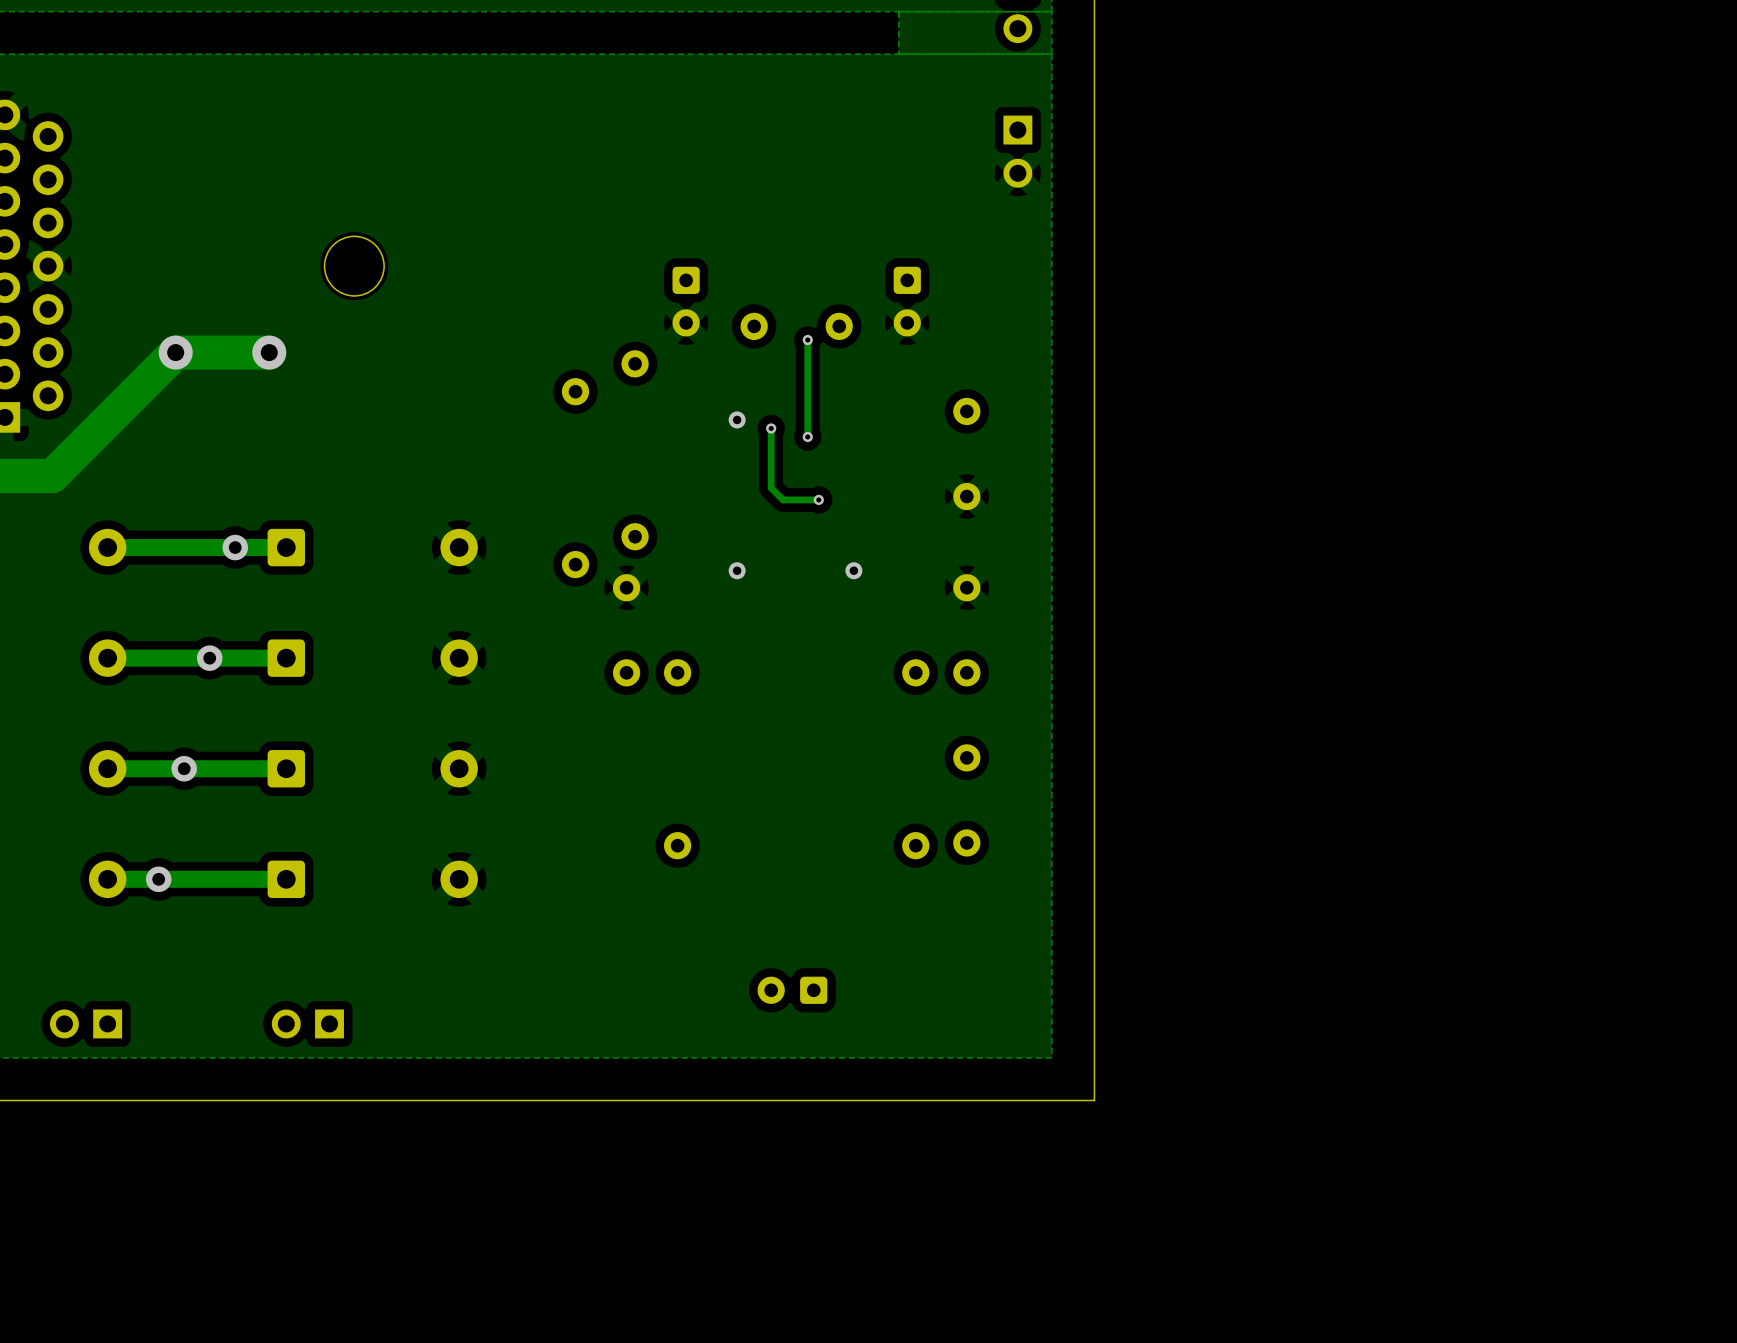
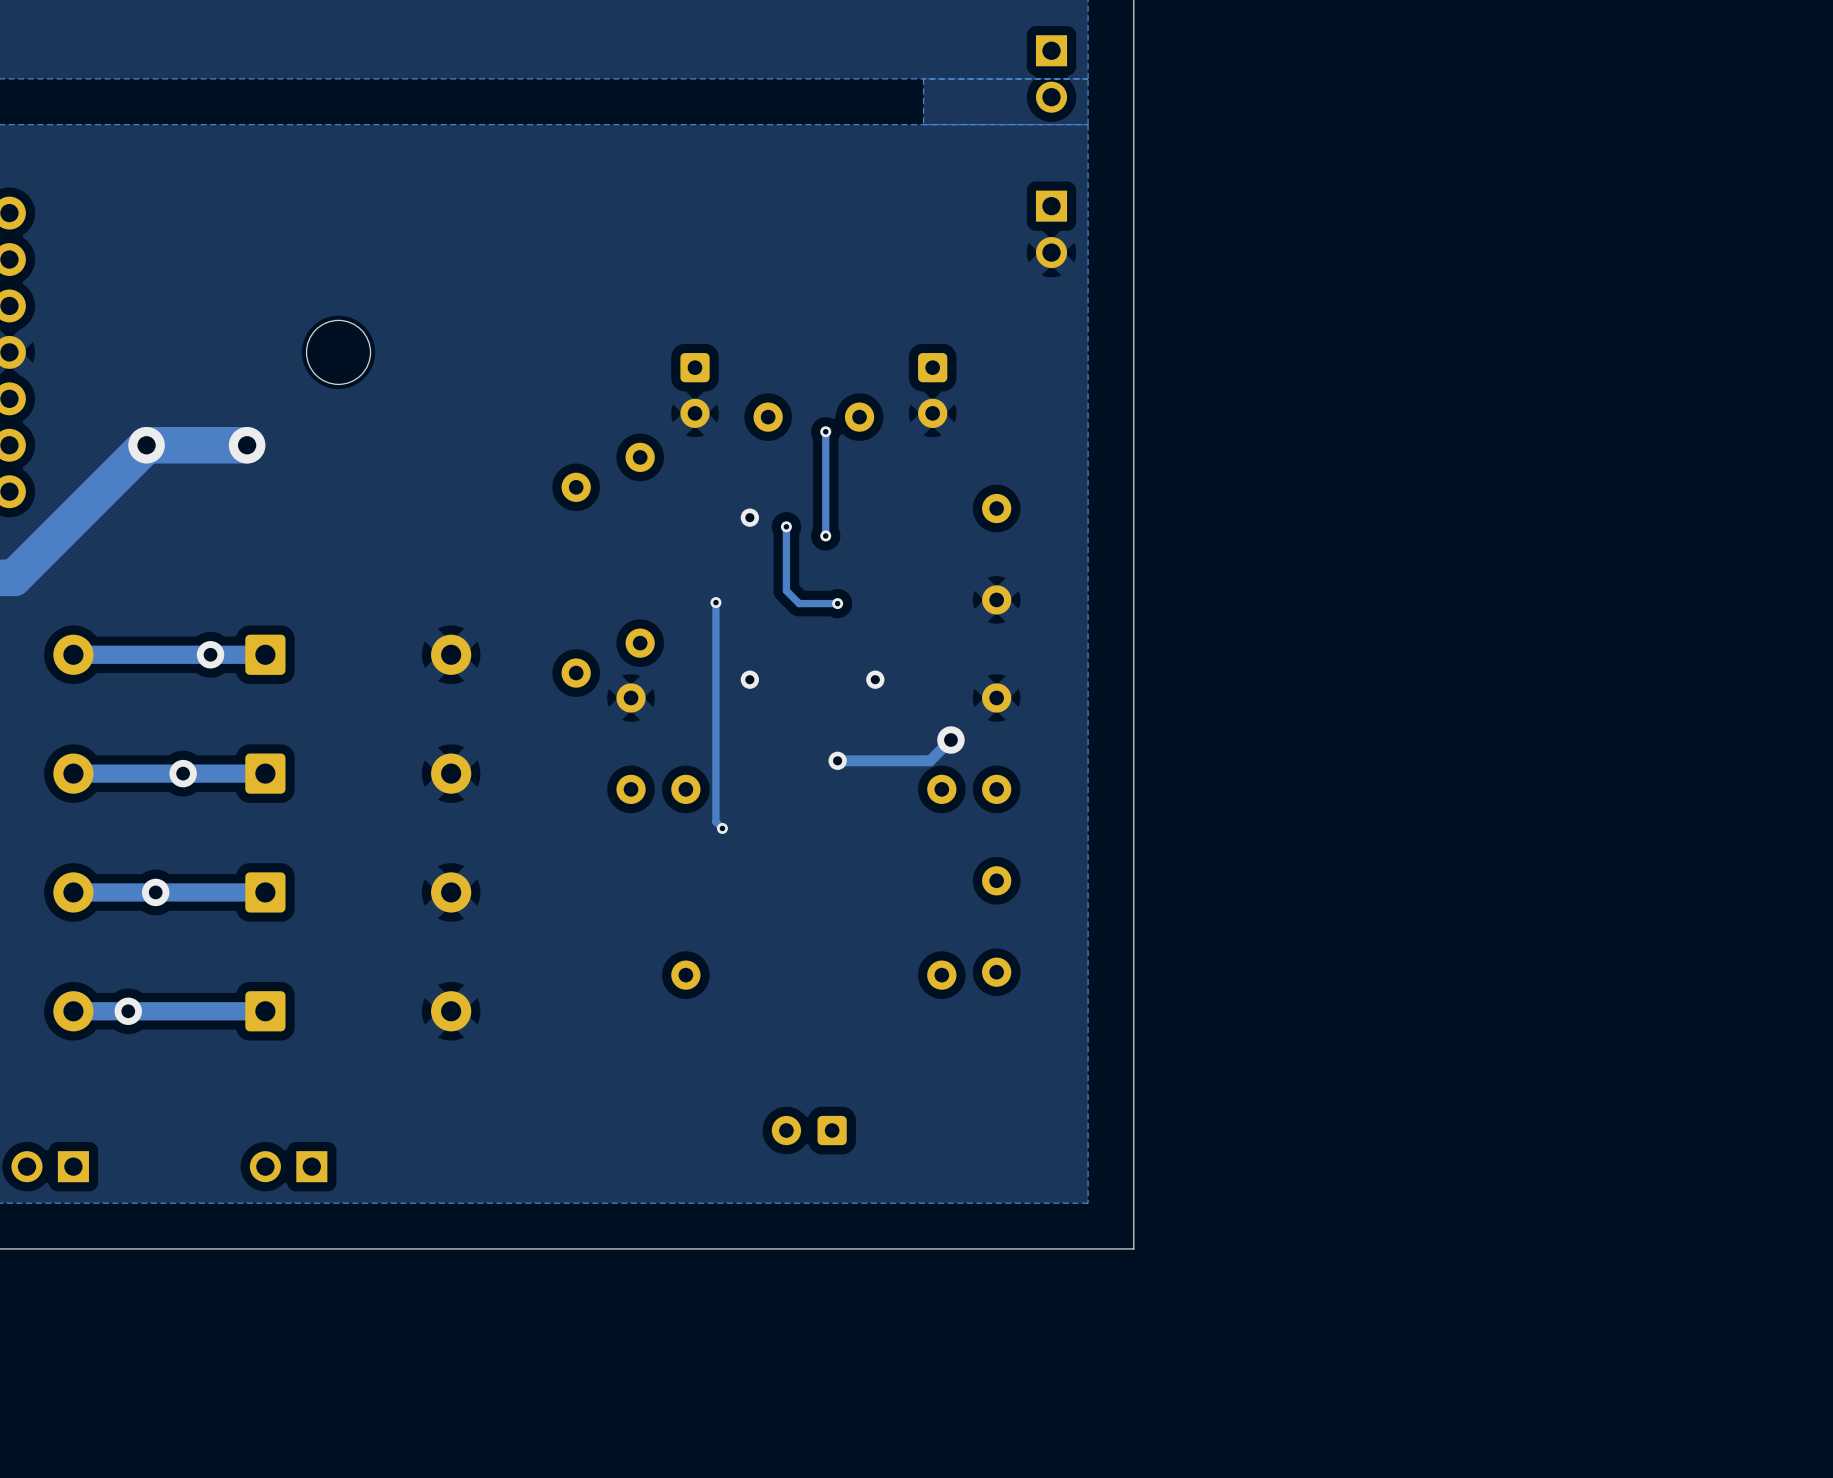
track: none -> (715, 602) (715, 821) (722, 828)
via: none -> (715, 602)
track: none -> (950, 740) (930, 760) (837, 760)
via: none -> (950, 740)
via: none -> (837, 760)
via: none -> (722, 828)

